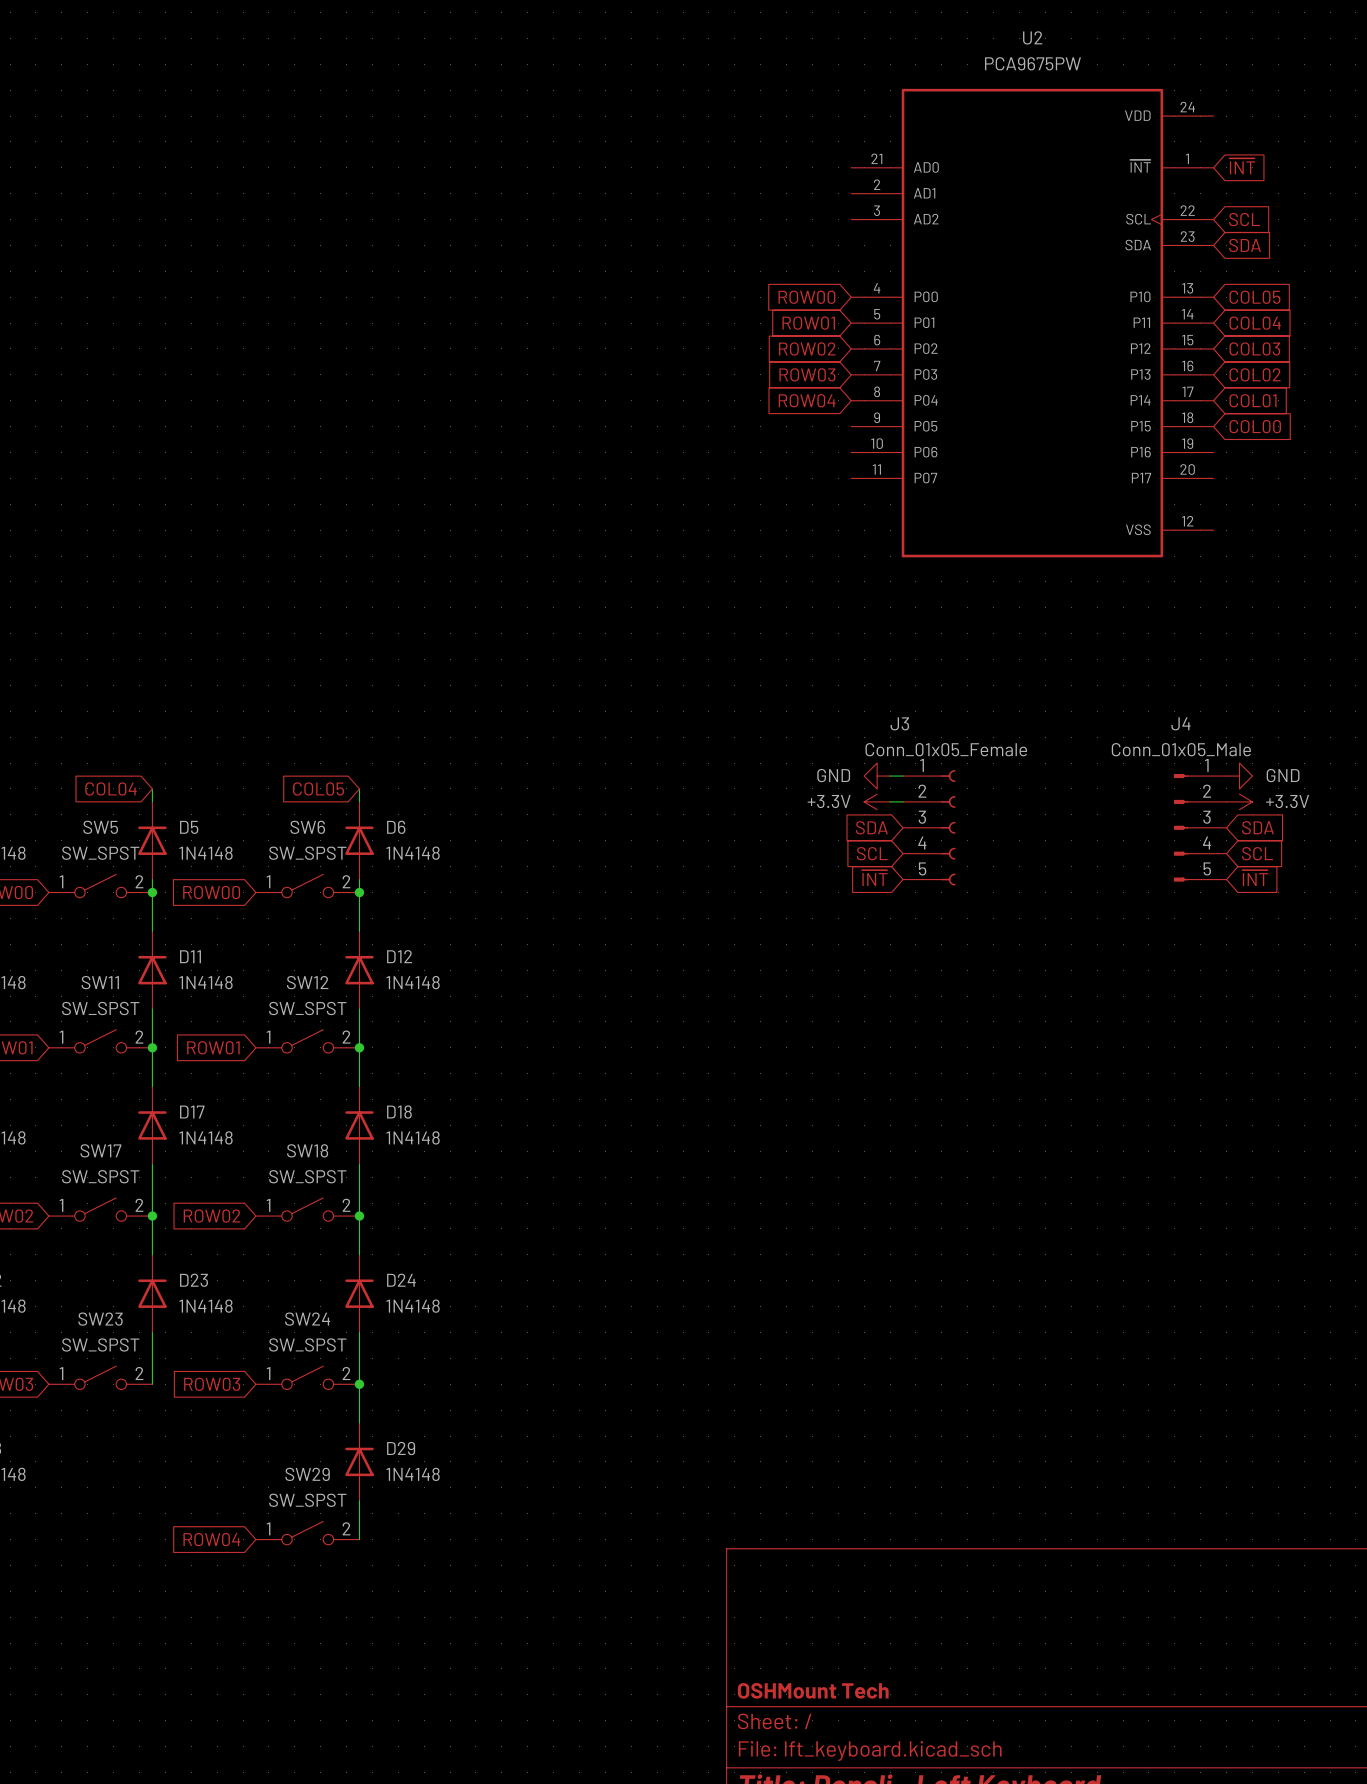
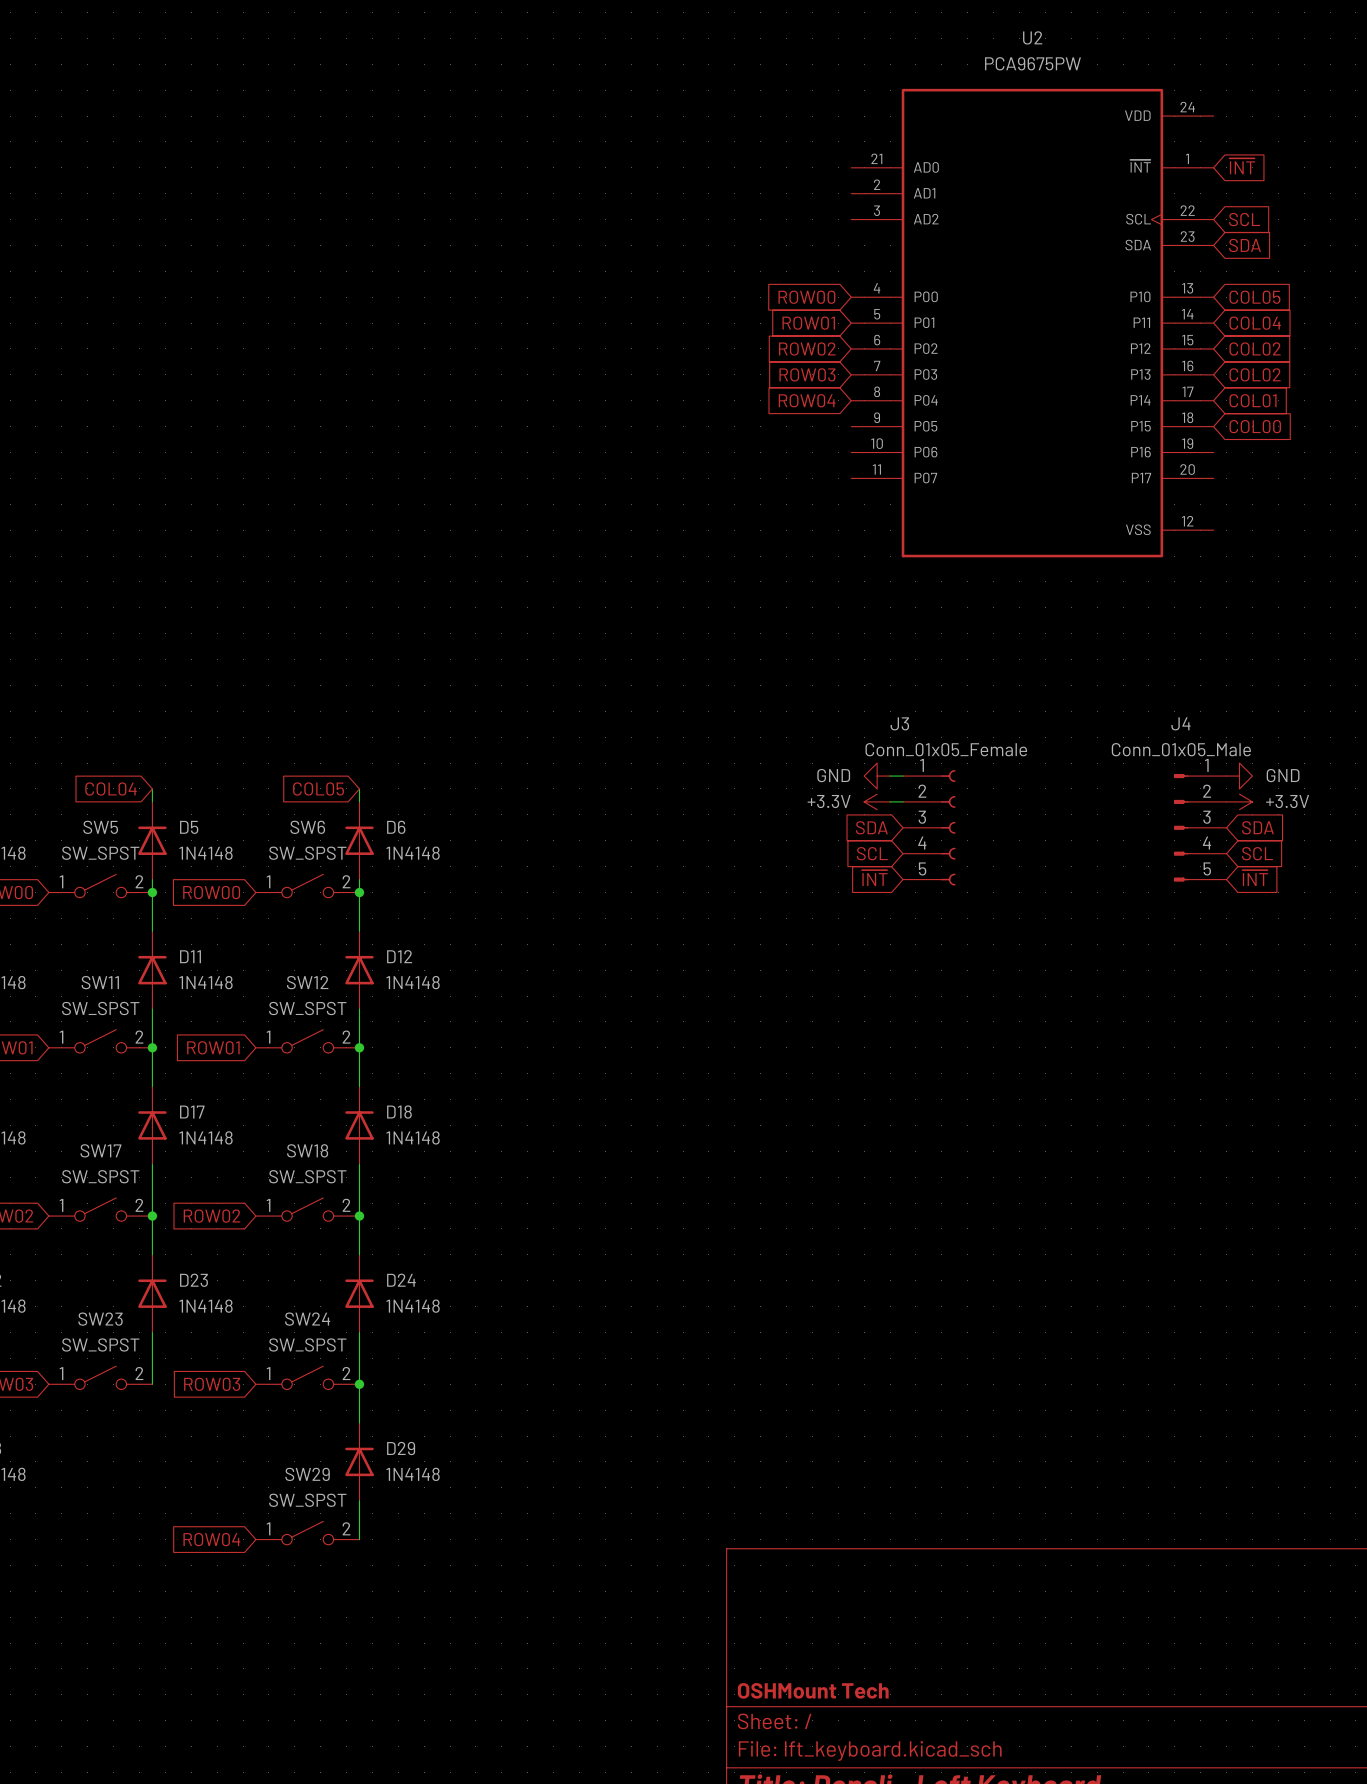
global label: COL03 (1254, 349) -> COL02 (1255, 349)

